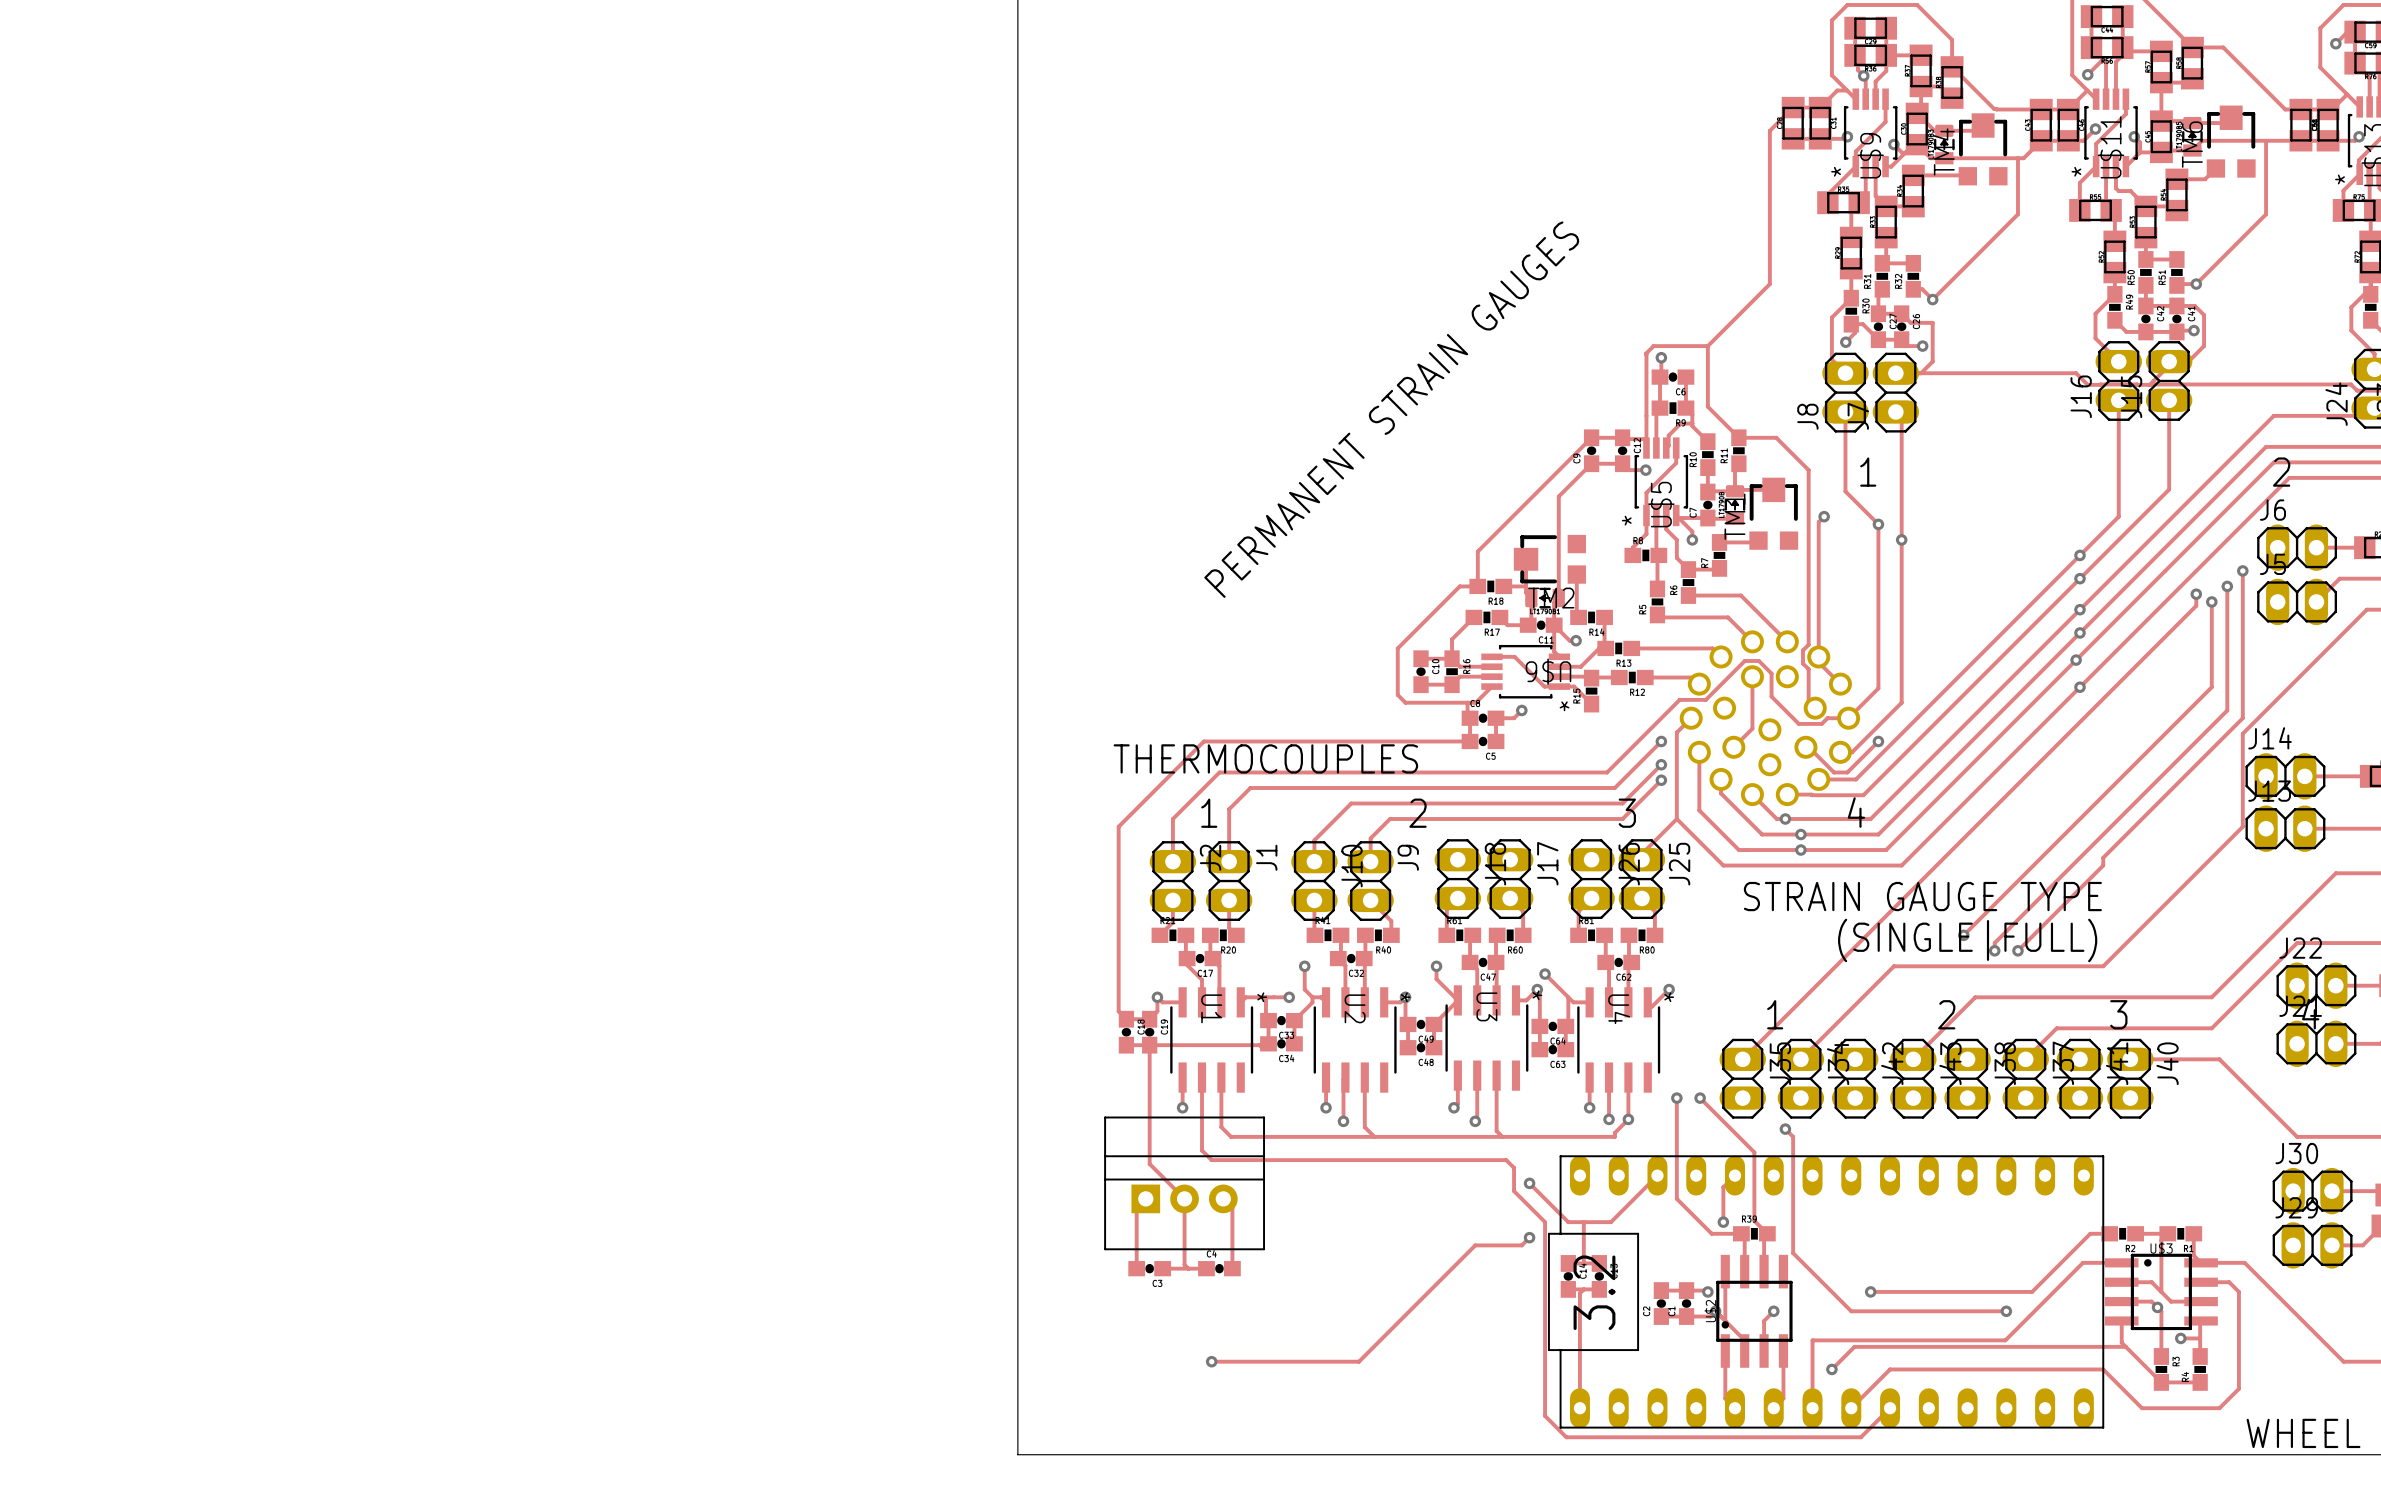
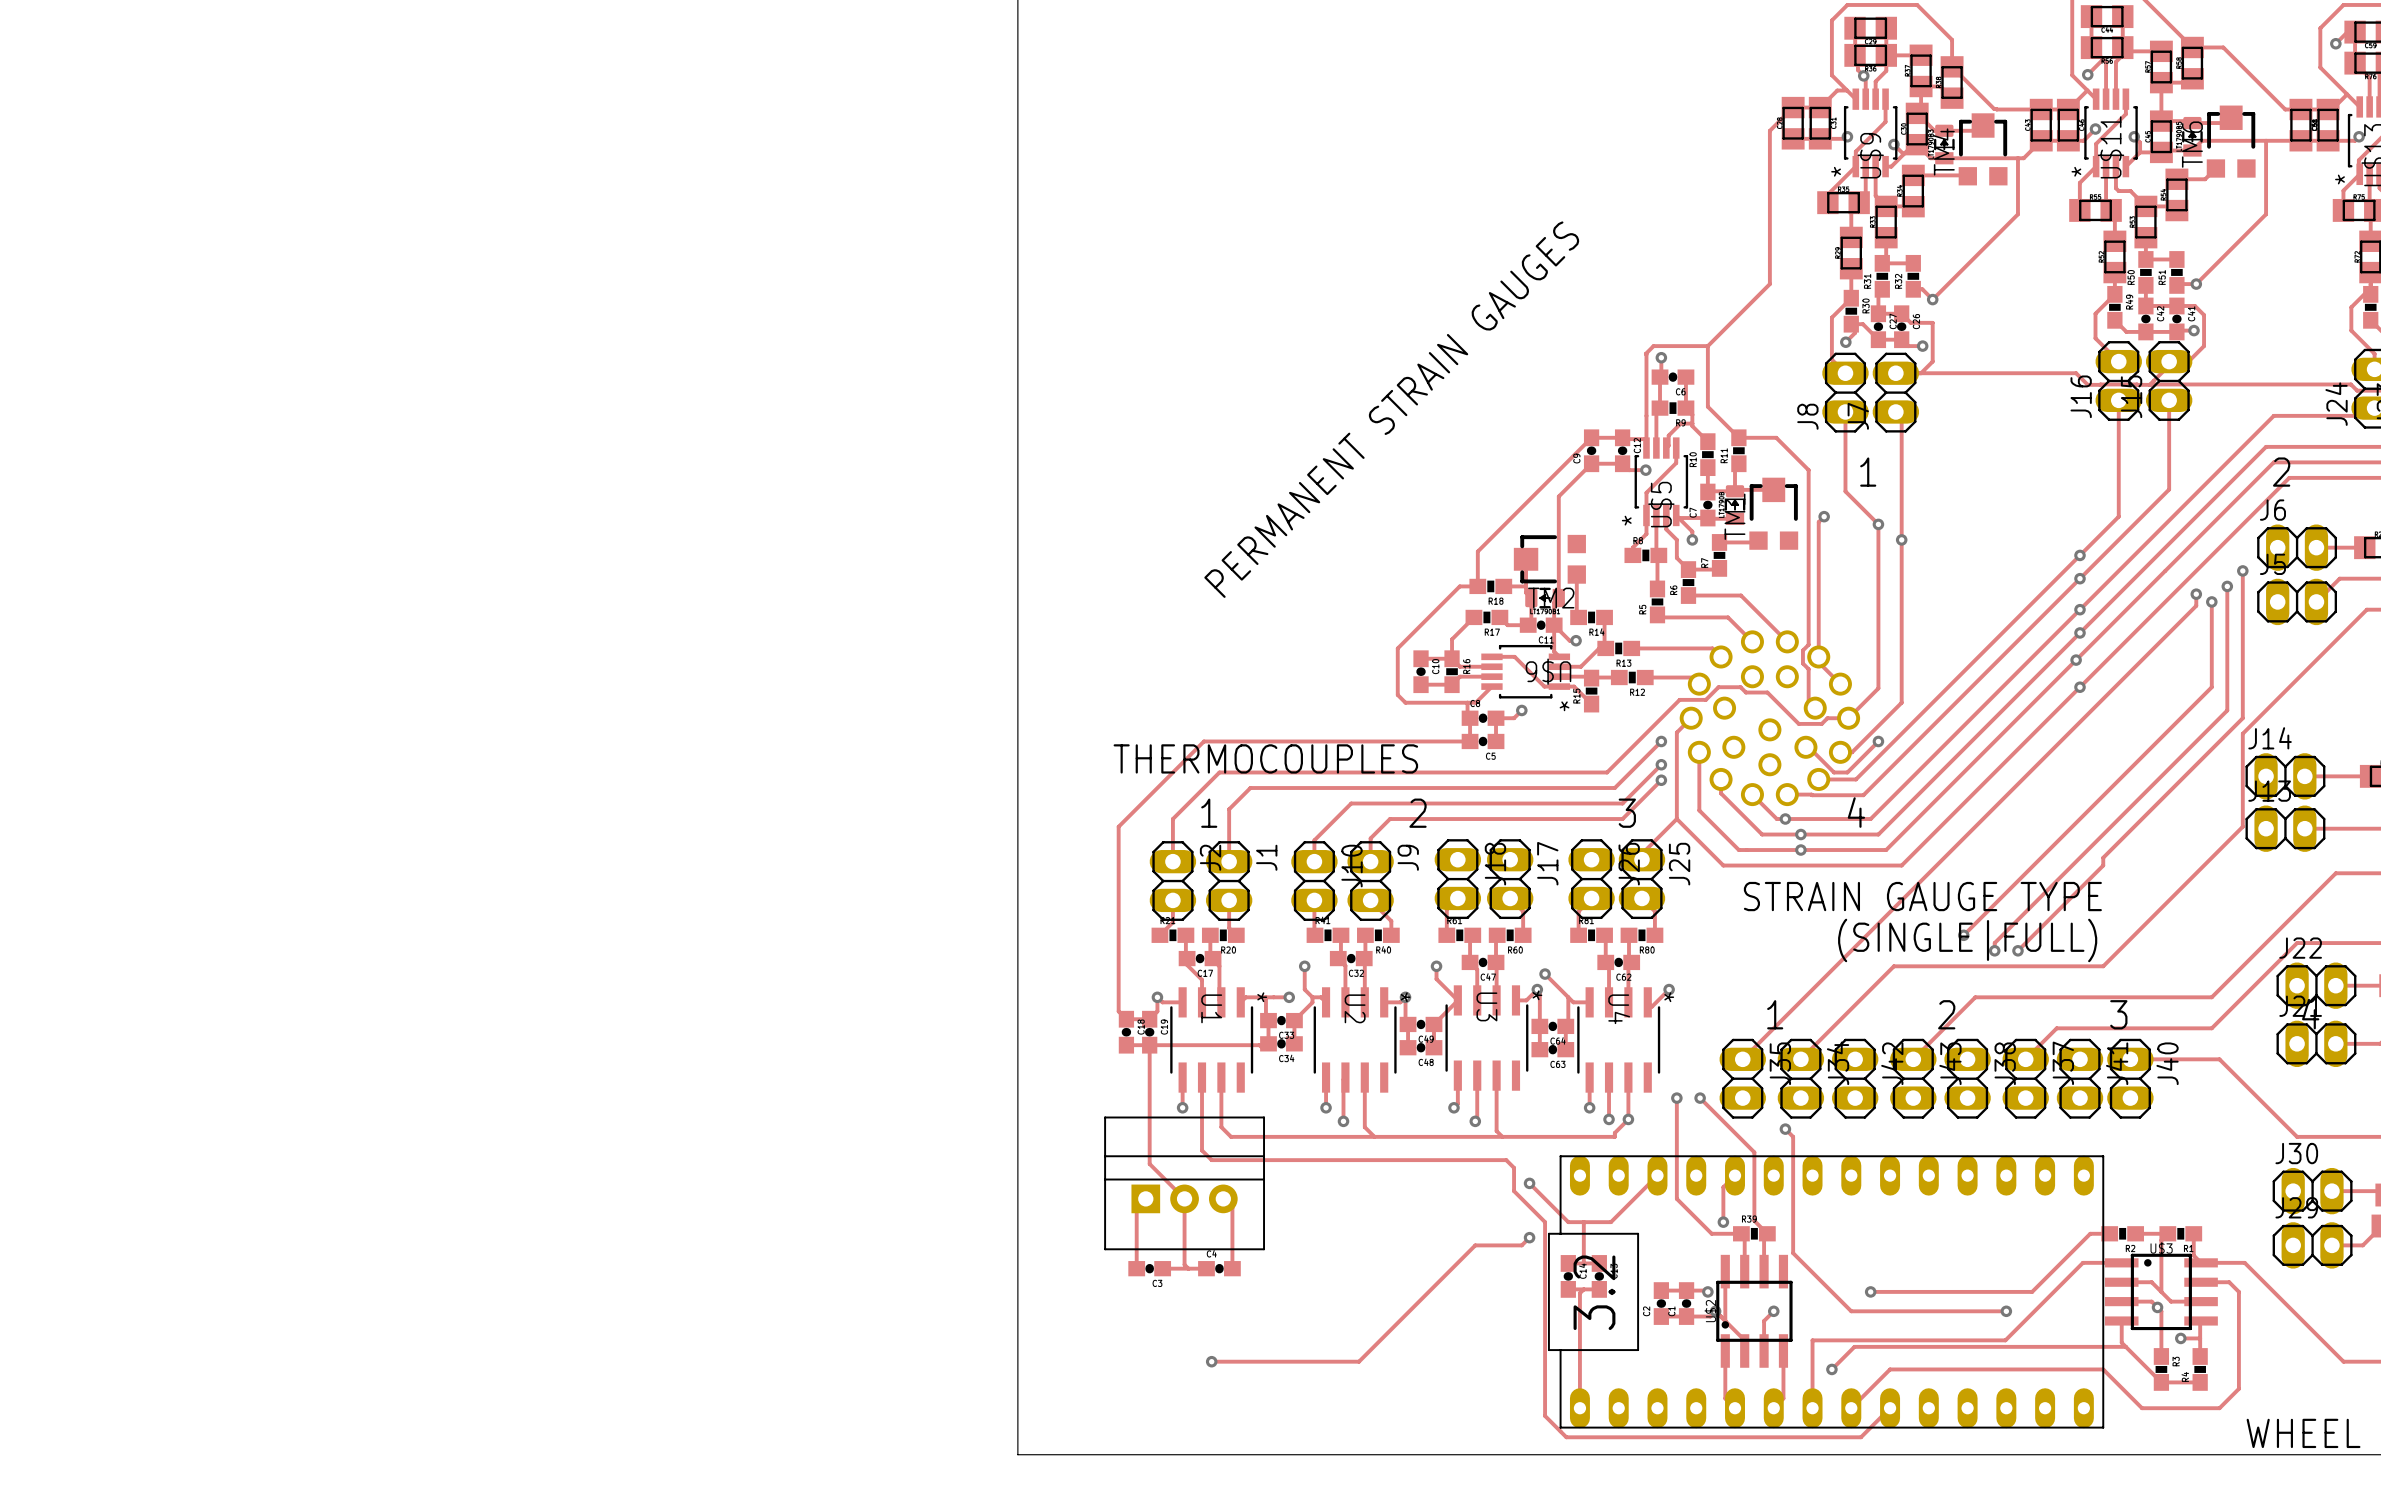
track: (1752, 676) (1752, 728) (1733, 747) -> none
track: (1718, 687) (1744, 660) (1758, 660) (1771, 673) (1771, 696) -> (1718, 687) (1740, 687) (1745, 692) (1767, 692) (1771, 696)

